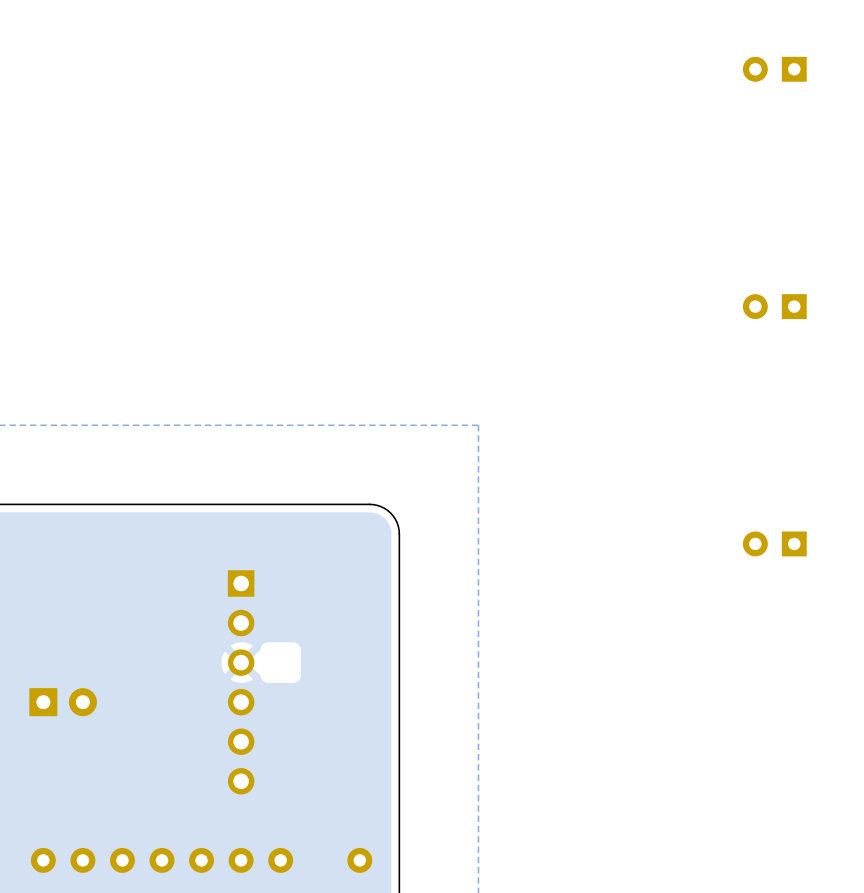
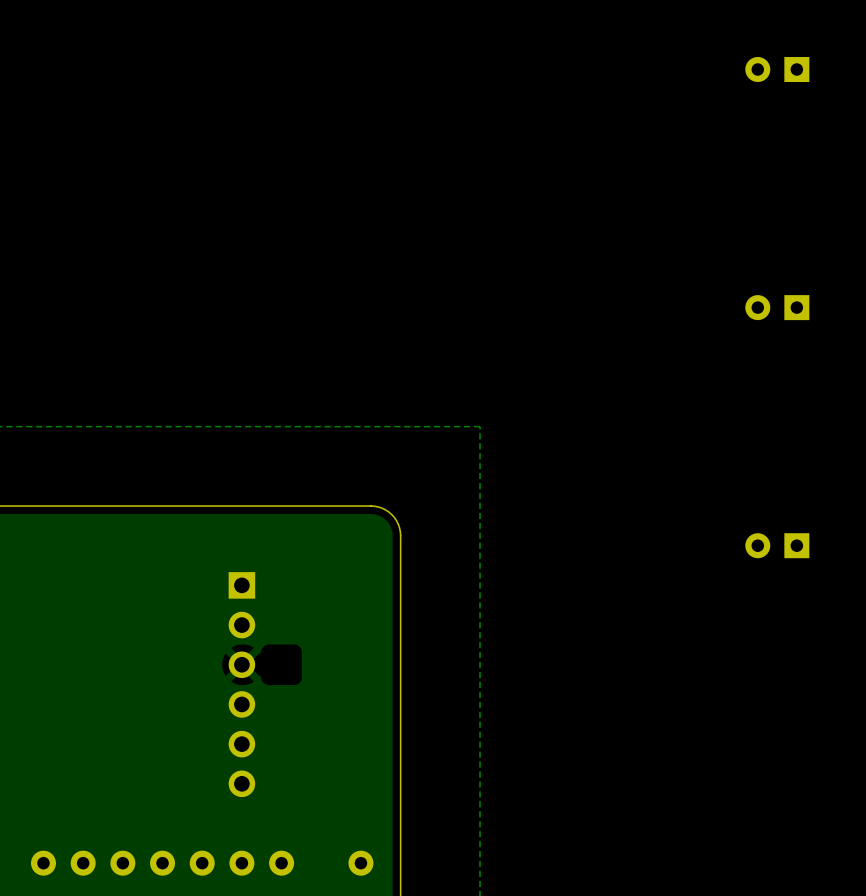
part: (63, 702) -> none

